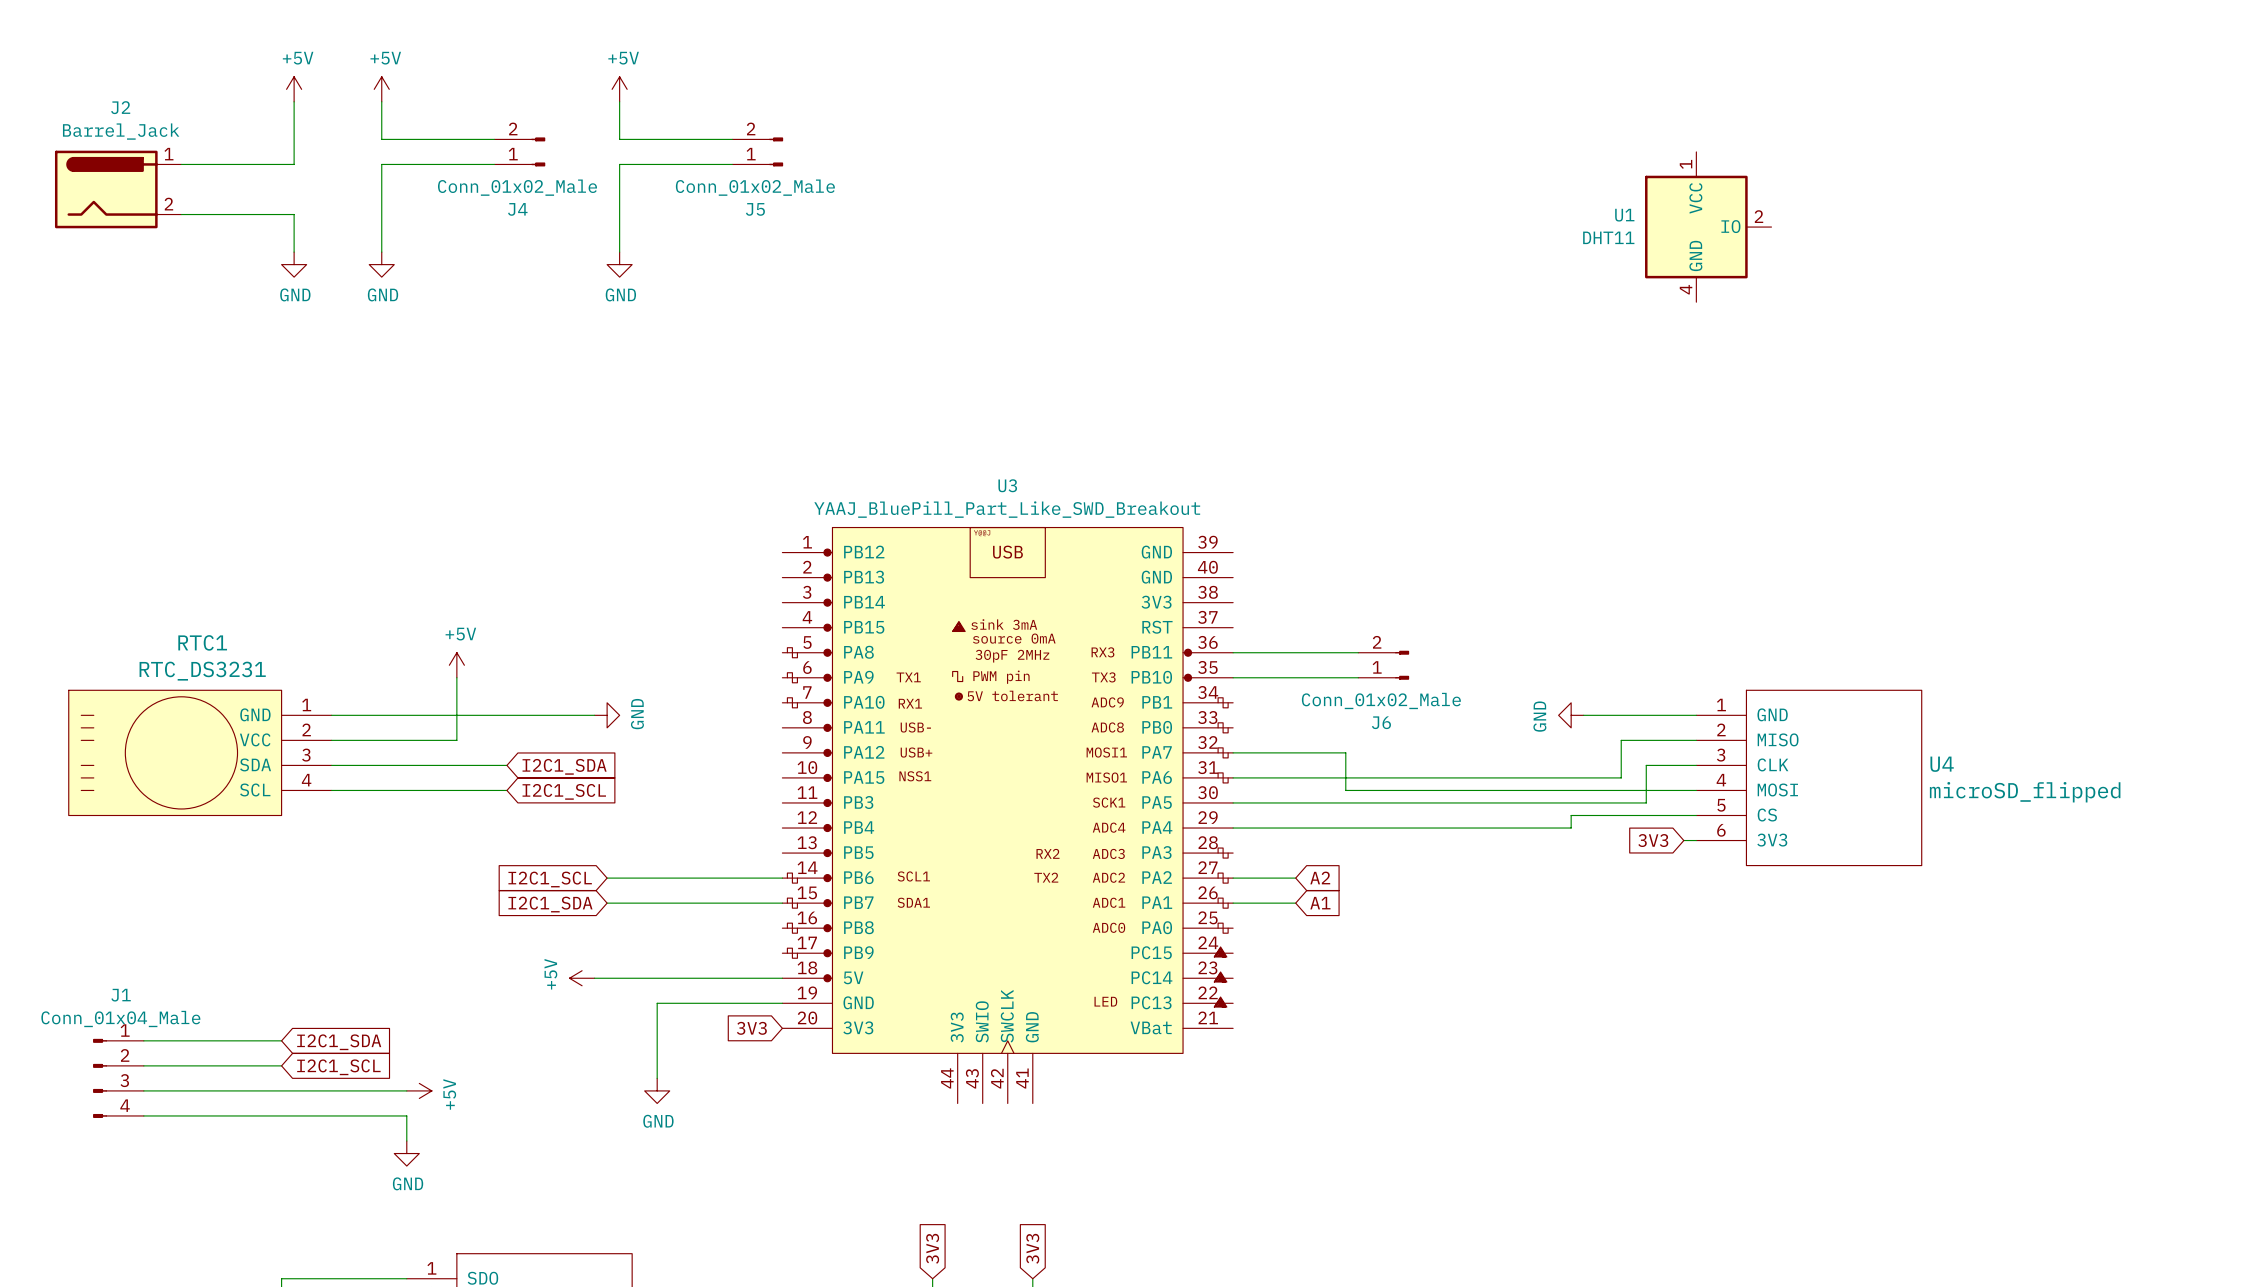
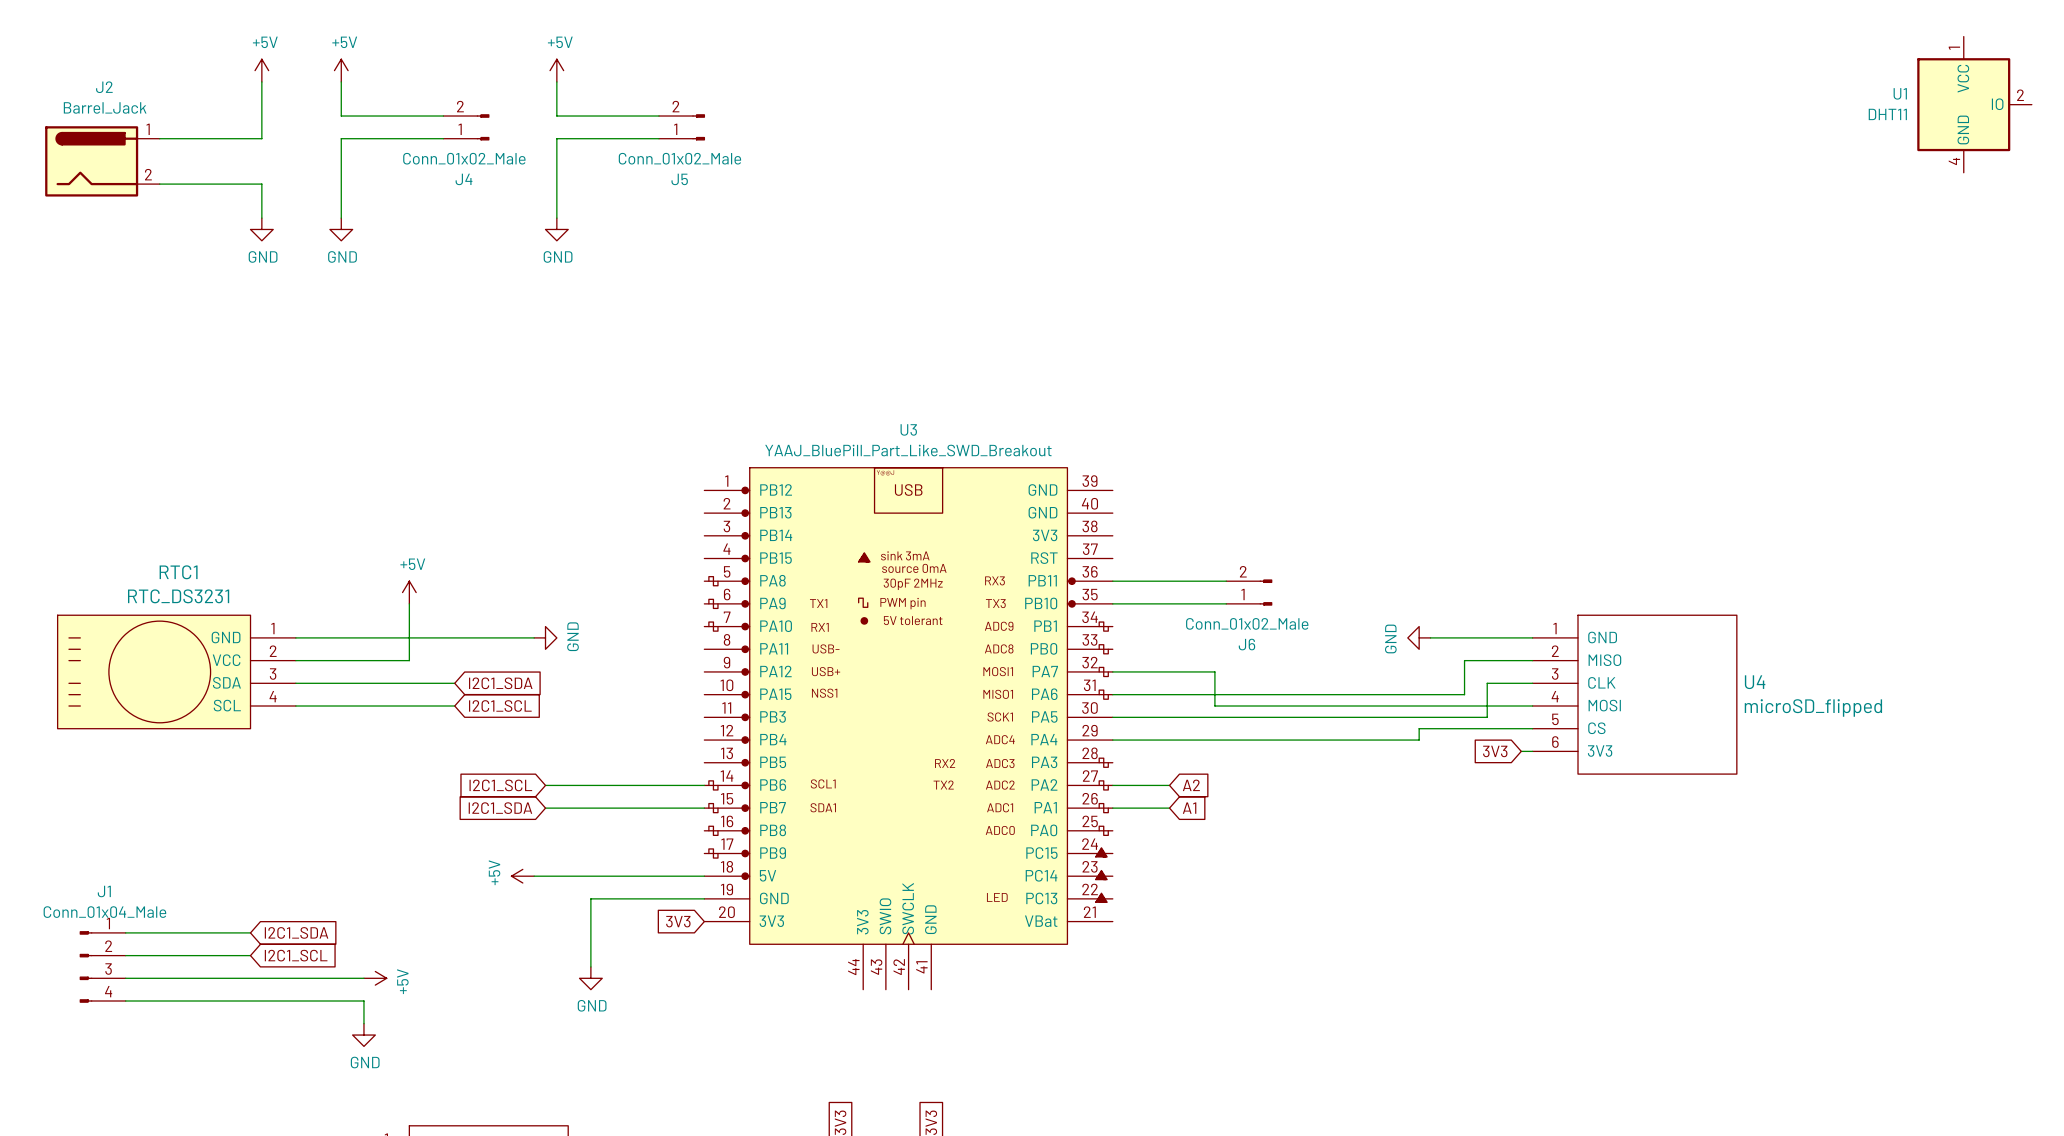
U1 position: (1708, 227) -> (1974, 104)

